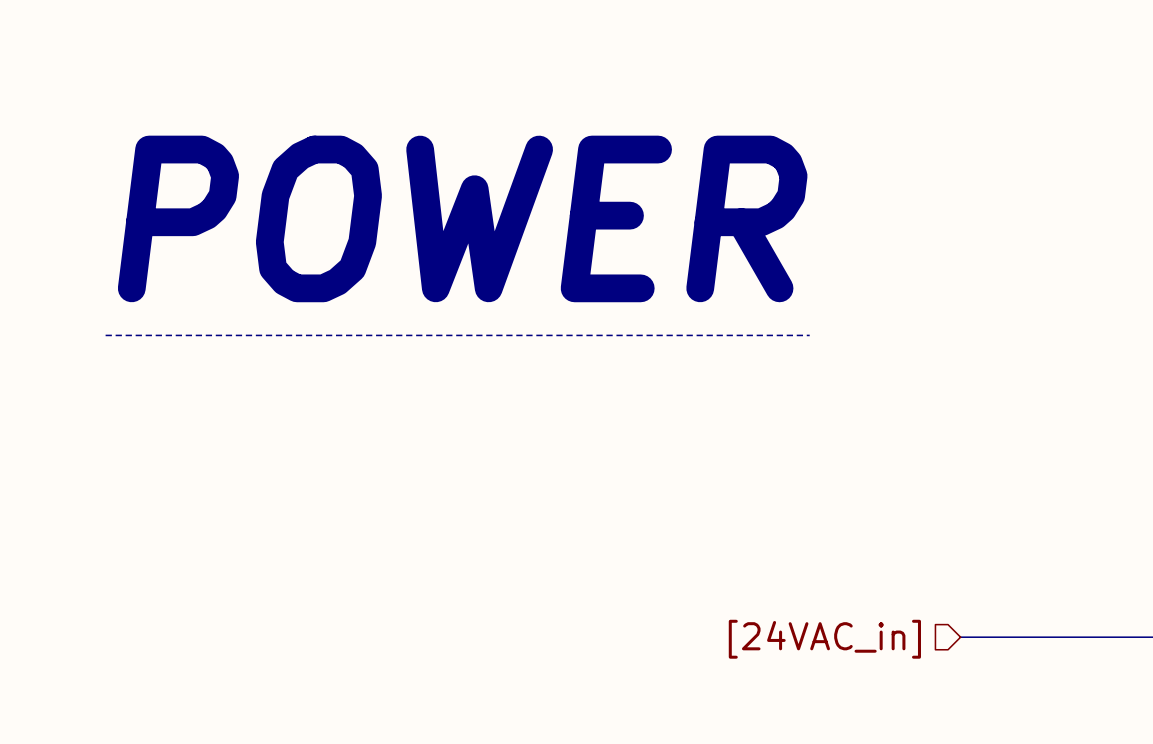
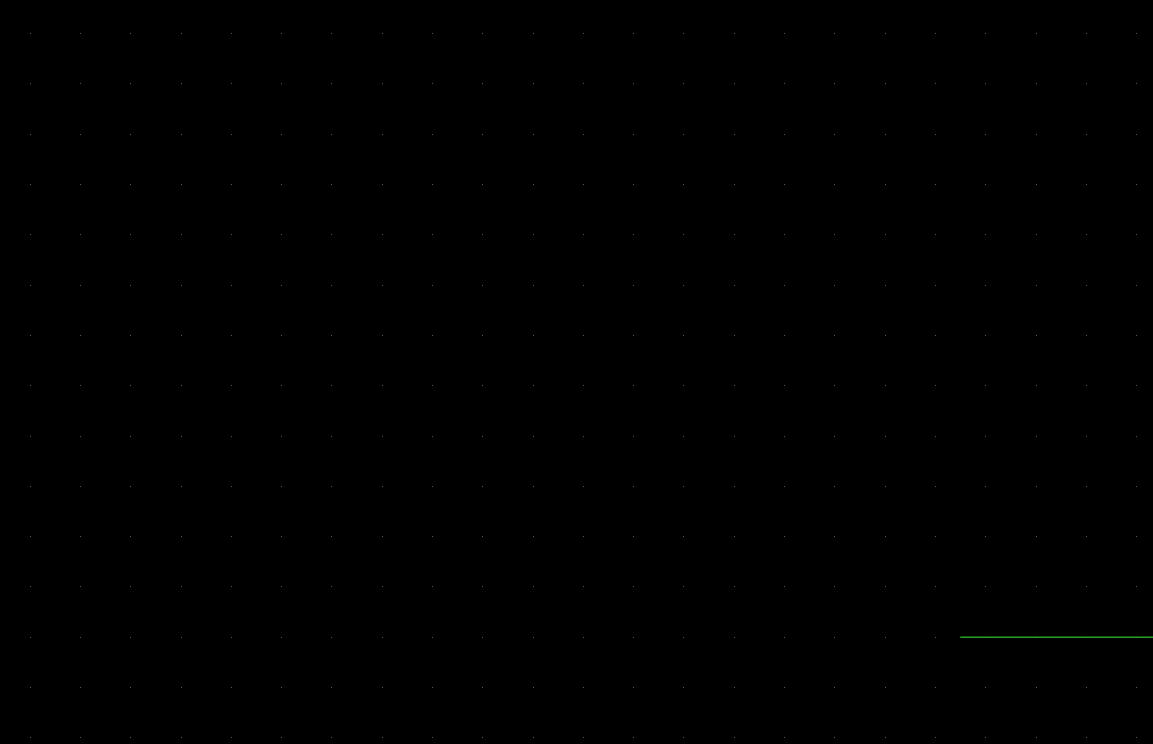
text: POWER (462, 218) -> none
line: (105, 335) (809, 335) -> none
hierarchical label: [24VAC_in] (824, 639) -> none

